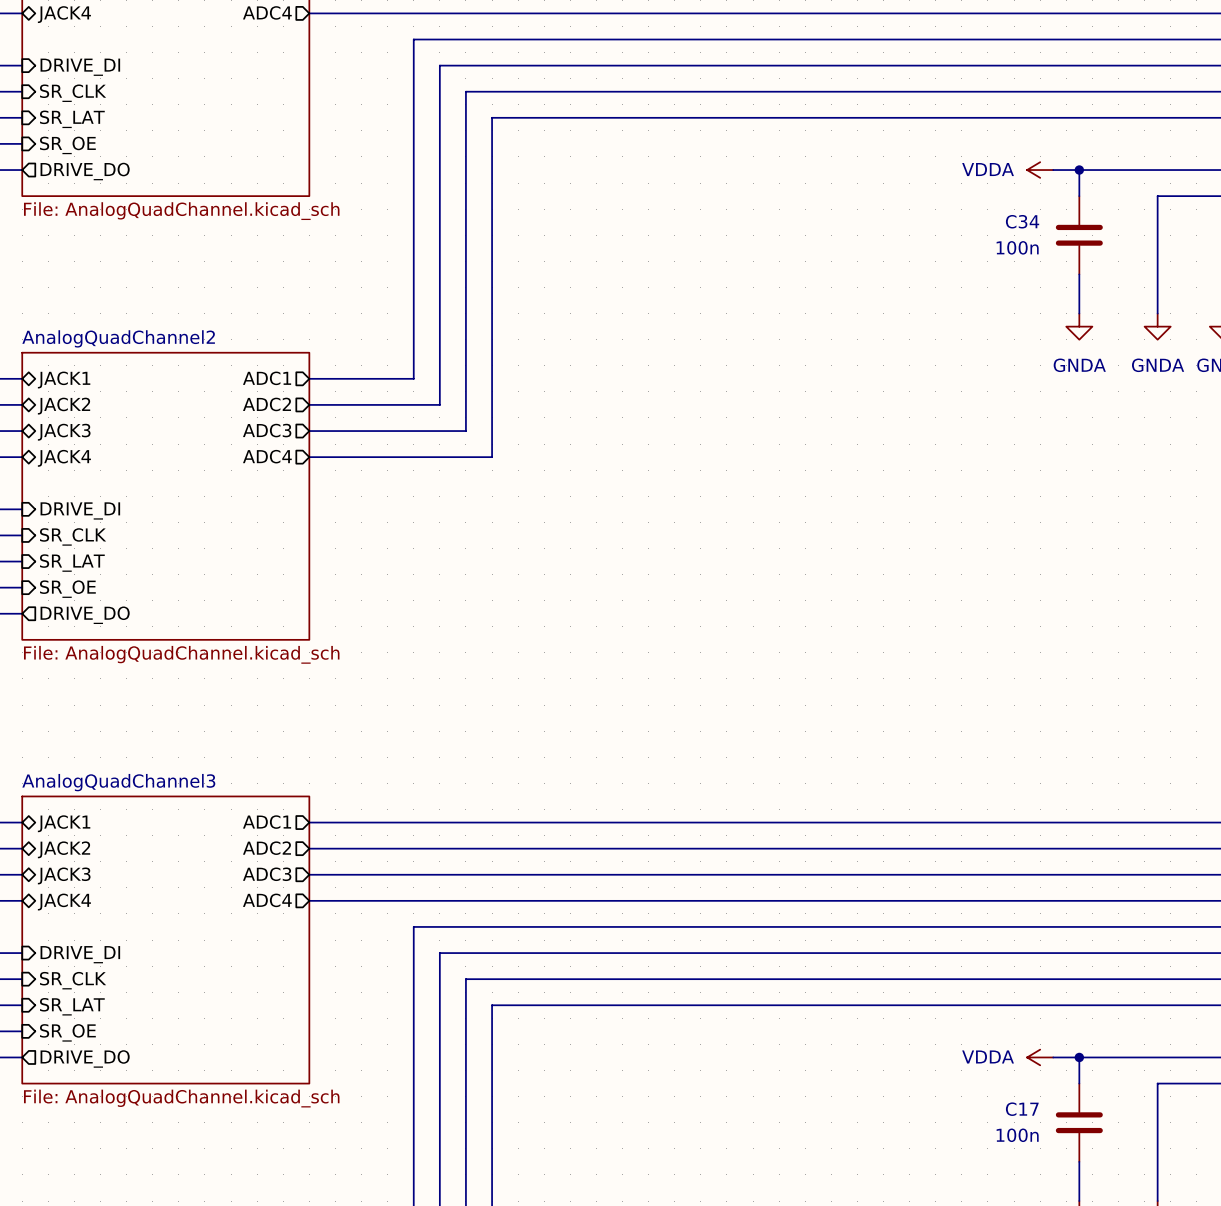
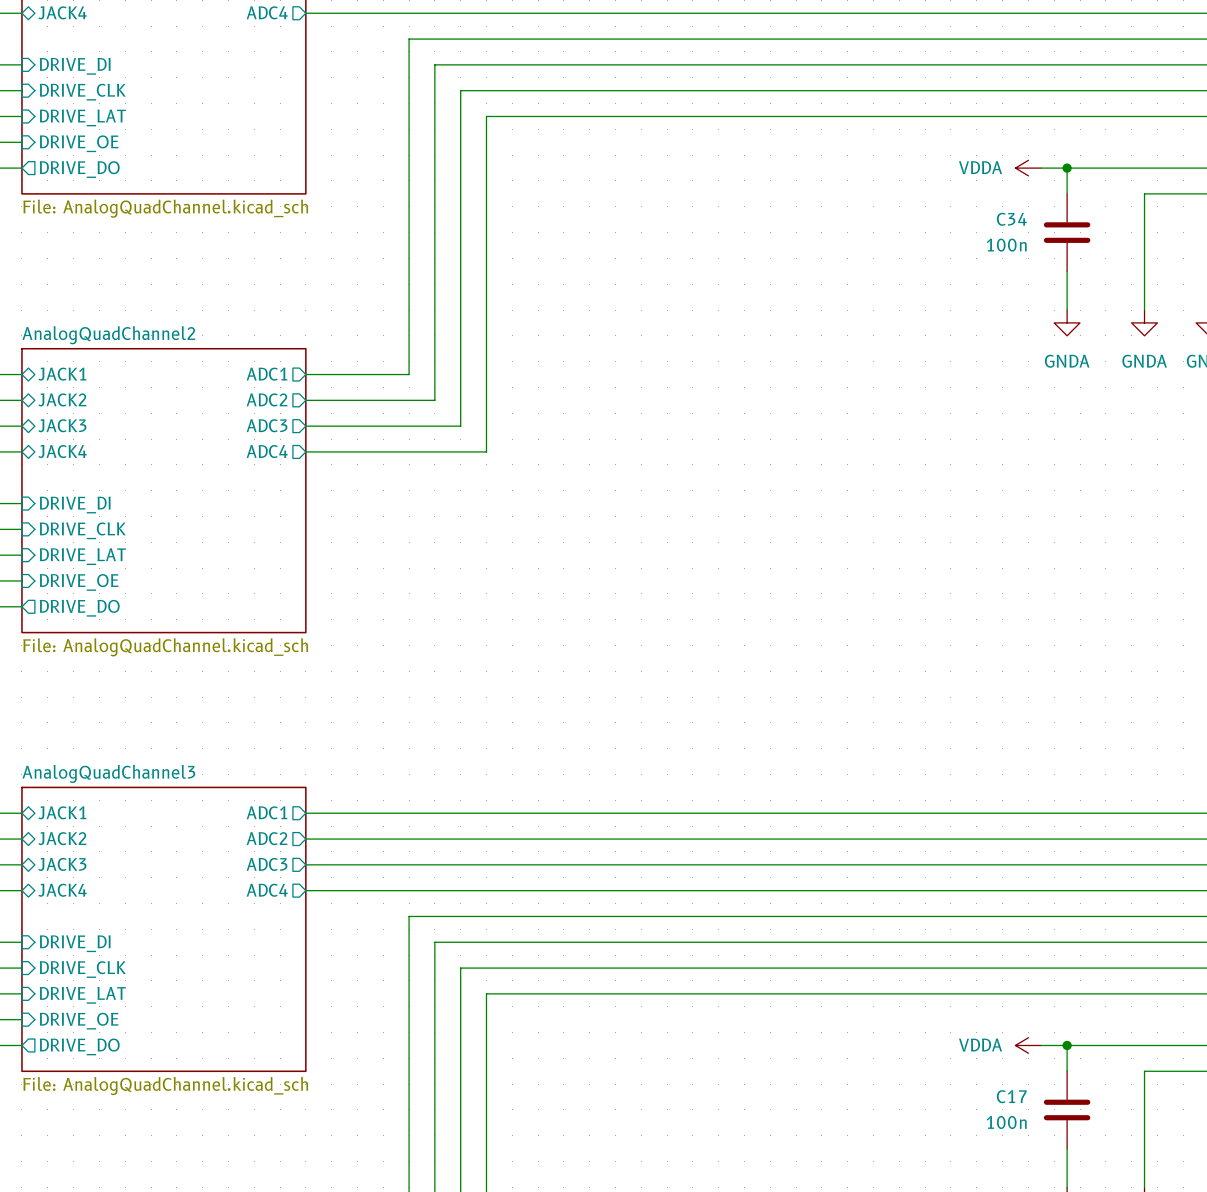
sheet pin: SR_CLK (73, 93) -> DRIVE_CLK (82, 92)
sheet pin: SR_LAT (72, 119) -> DRIVE_LAT (82, 117)
sheet pin: SR_OE (67, 145) -> DRIVE_OE (79, 143)
sheet pin: SR_CLK (73, 536) -> DRIVE_CLK (82, 530)
sheet pin: SR_LAT (72, 563) -> DRIVE_LAT (82, 556)
sheet pin: SR_OE (67, 589) -> DRIVE_OE (79, 582)
sheet pin: SR_CLK (73, 980) -> DRIVE_CLK (82, 969)
sheet pin: SR_LAT (72, 1006) -> DRIVE_LAT (82, 995)
sheet pin: SR_OE (67, 1032) -> DRIVE_OE (79, 1021)

